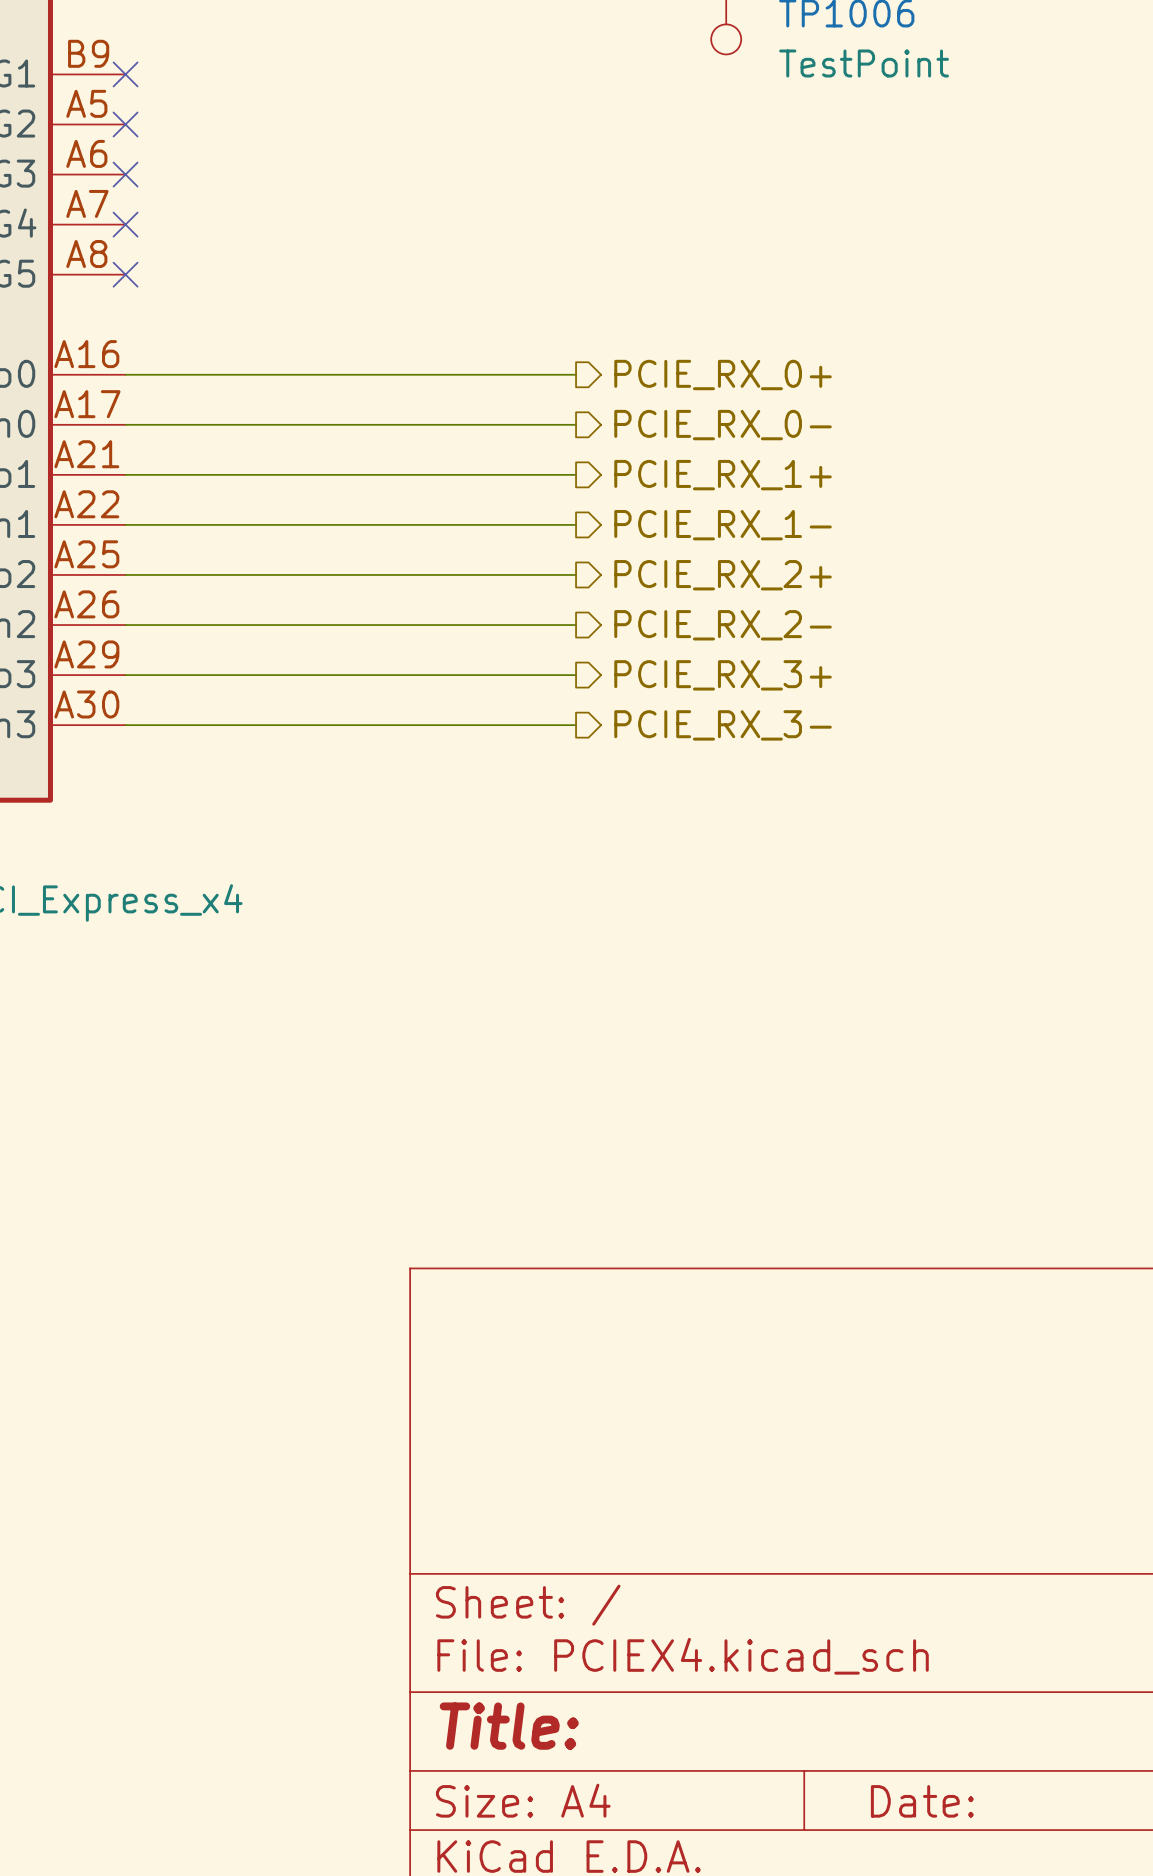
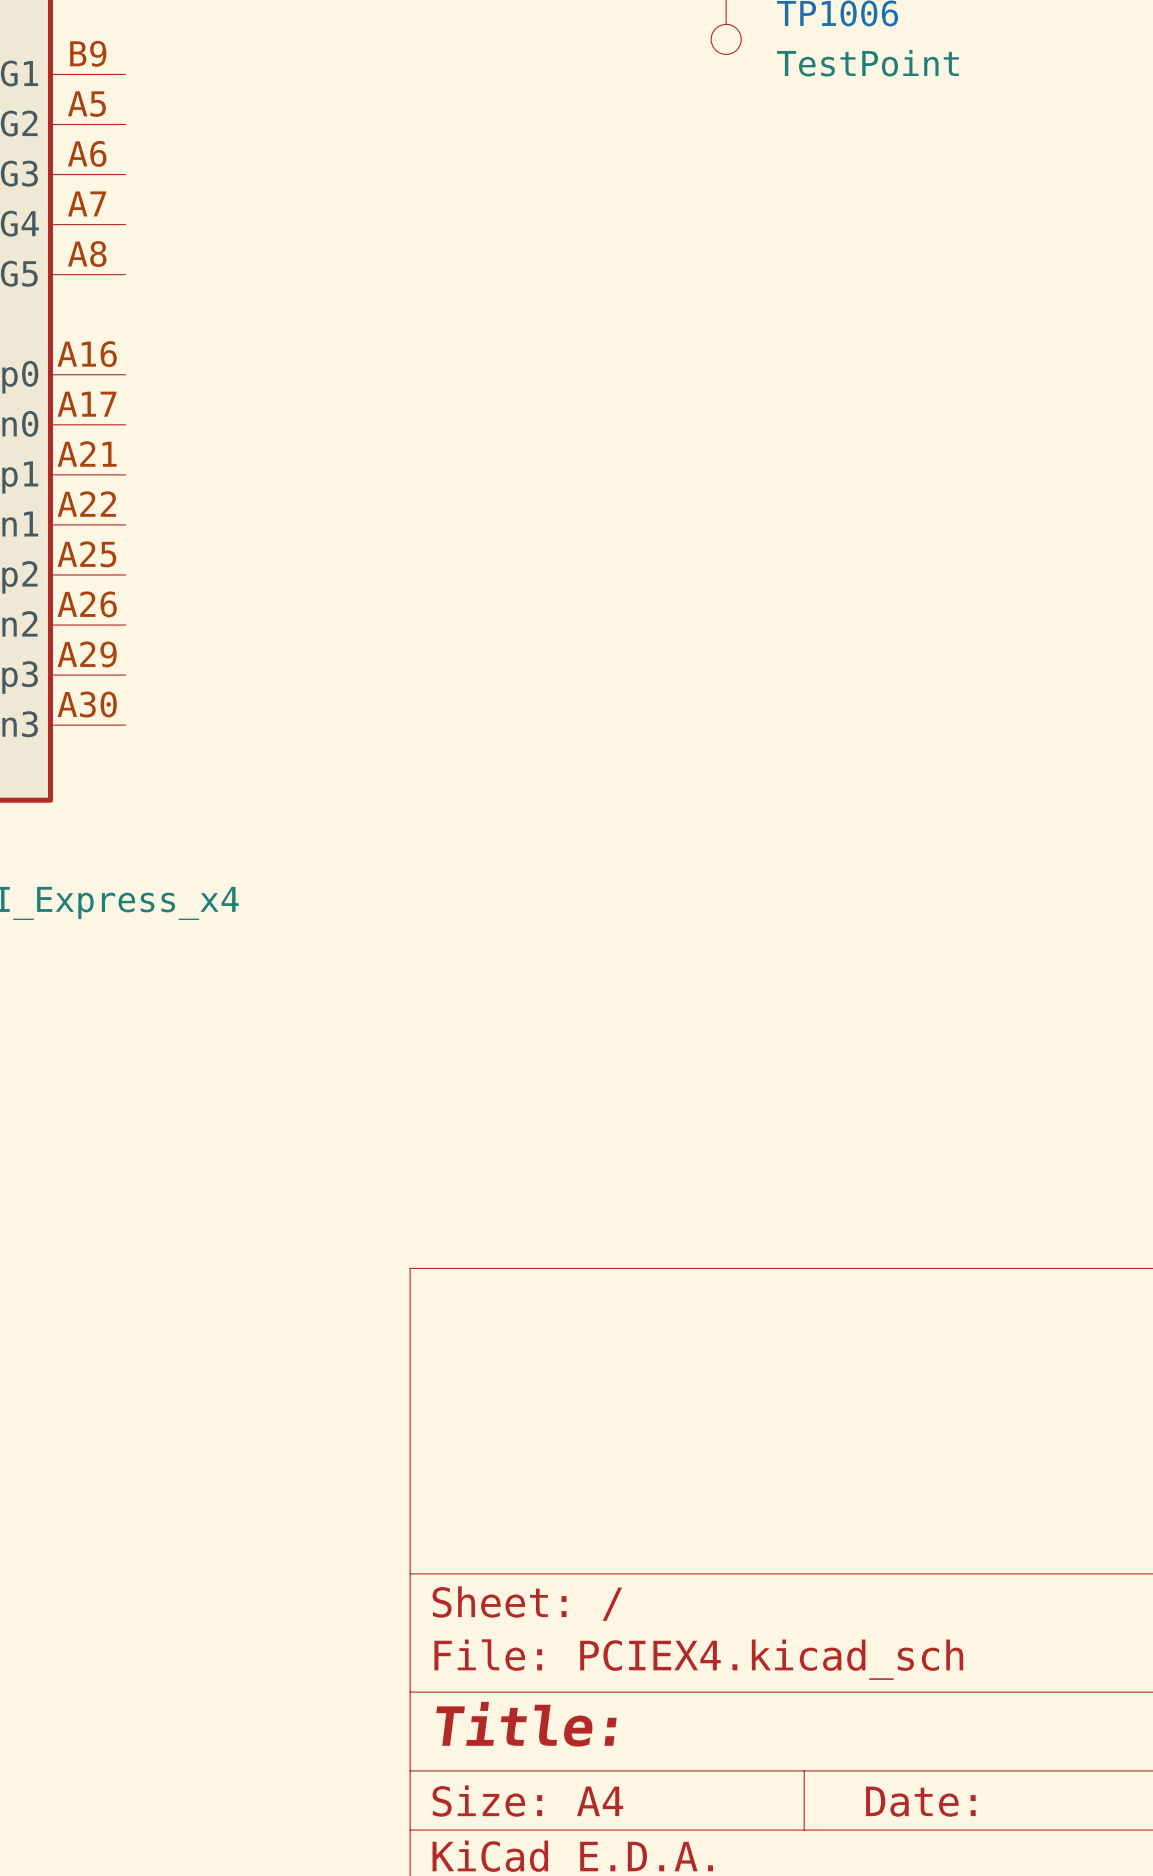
no-connect mark: (125, 74) -> none
no-connect mark: (125, 124) -> none
no-connect mark: (125, 174) -> none
no-connect mark: (125, 224) -> none
no-connect mark: (125, 274) -> none
wire: (125, 374) (576, 374) -> none
hierarchical label: PCIE_RX_0+ (723, 375) -> none
wire: (125, 424) (576, 424) -> none
hierarchical label: PCIE_RX_0- (723, 425) -> none
wire: (125, 474) (576, 474) -> none
hierarchical label: PCIE_RX_1+ (723, 475) -> none
wire: (125, 524) (576, 524) -> none
hierarchical label: PCIE_RX_1- (723, 525) -> none
wire: (125, 574) (576, 574) -> none
hierarchical label: PCIE_RX_2+ (723, 575) -> none
wire: (125, 625) (576, 625) -> none
hierarchical label: PCIE_RX_2- (723, 625) -> none
wire: (125, 675) (576, 675) -> none
hierarchical label: PCIE_RX_3+ (723, 675) -> none
wire: (125, 725) (576, 725) -> none
hierarchical label: PCIE_RX_3- (723, 725) -> none

